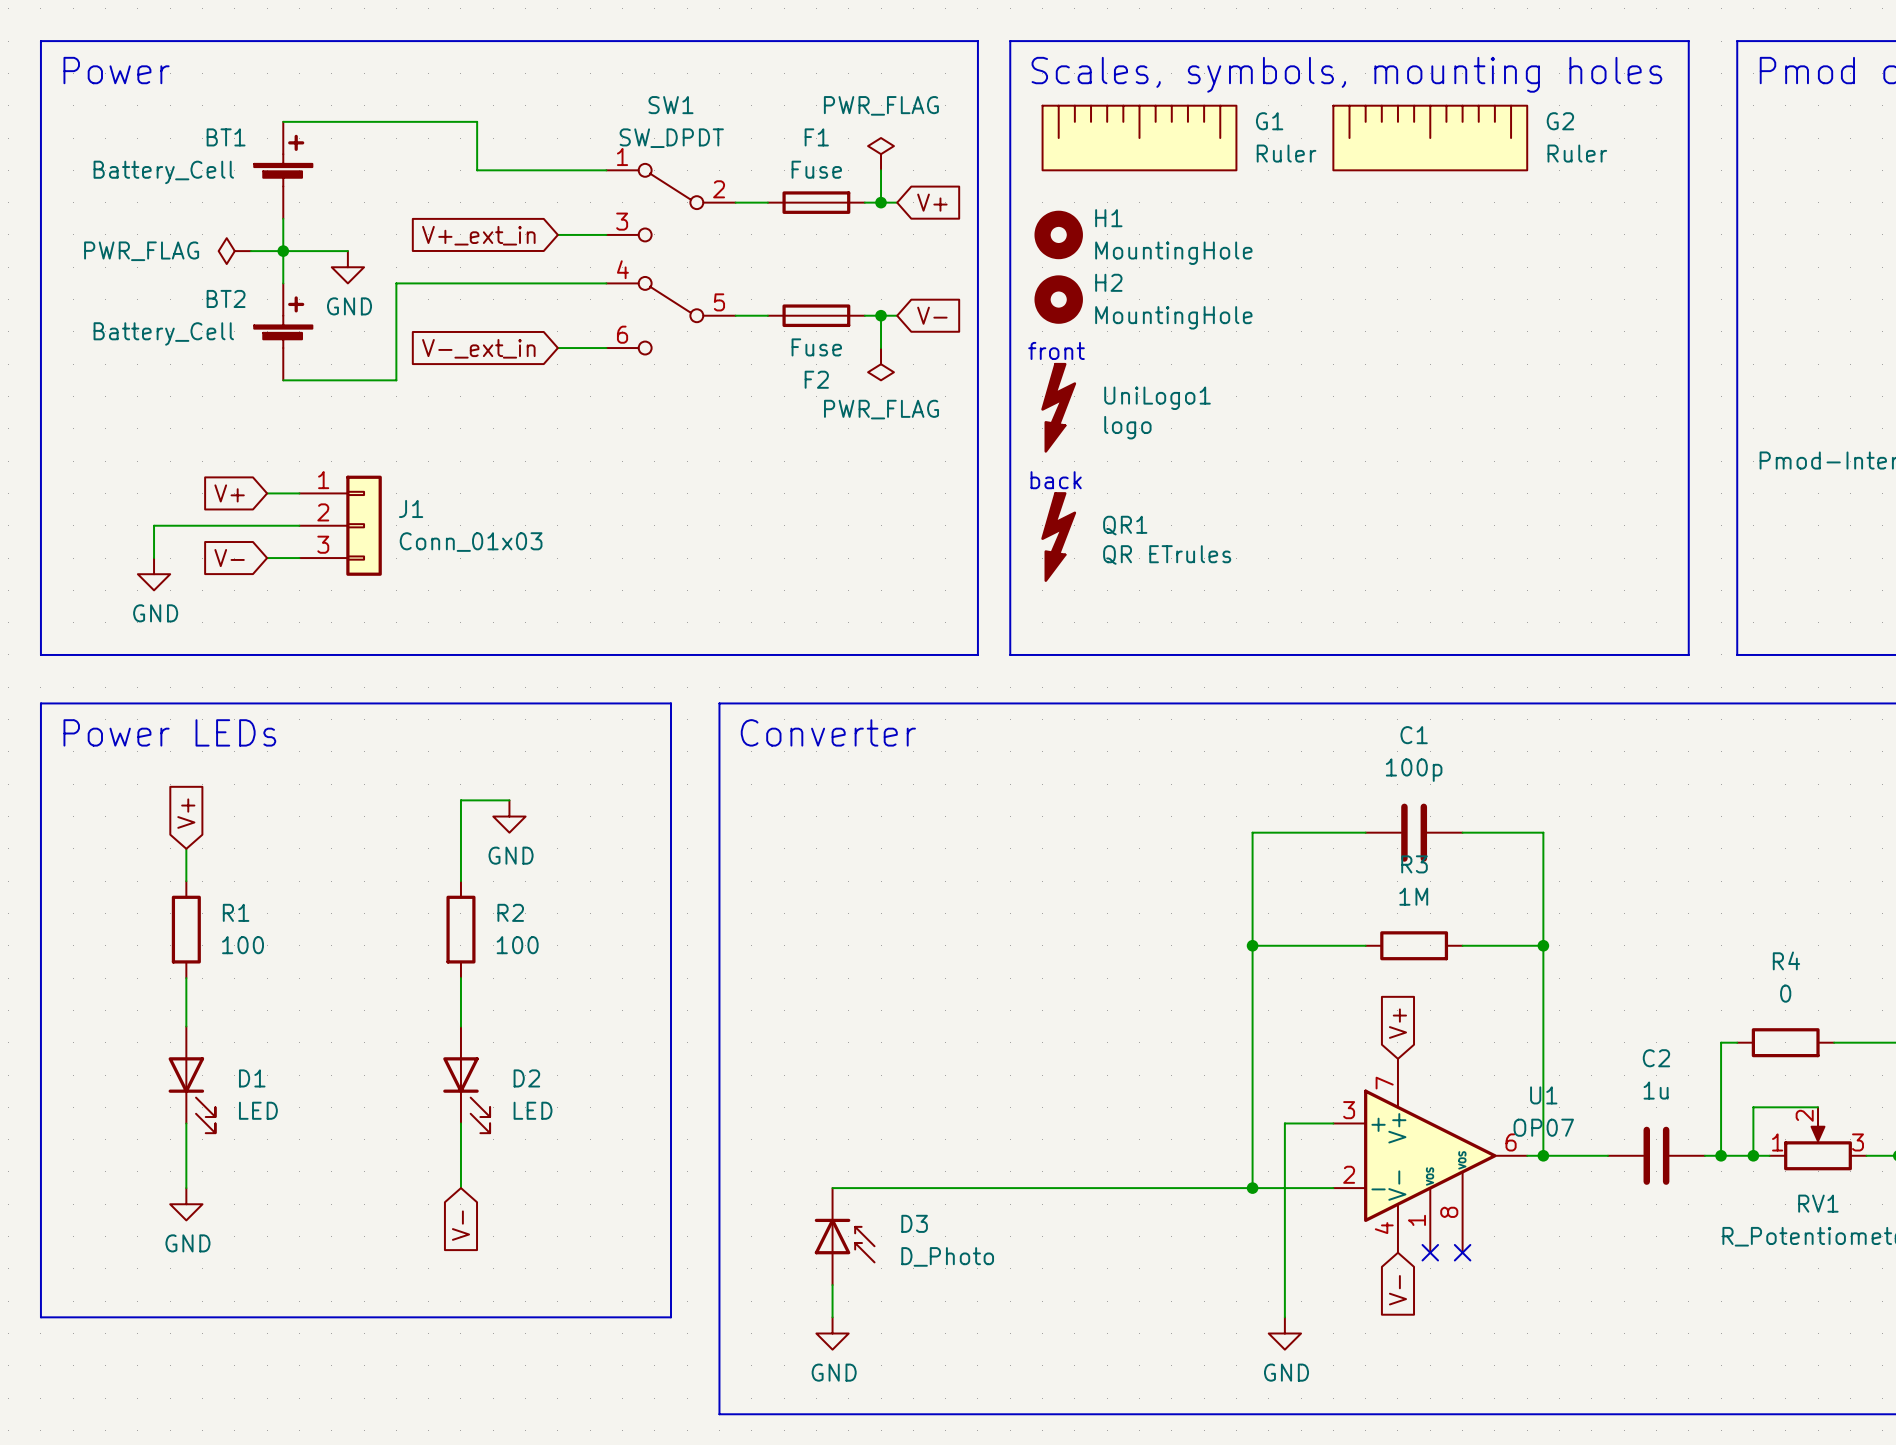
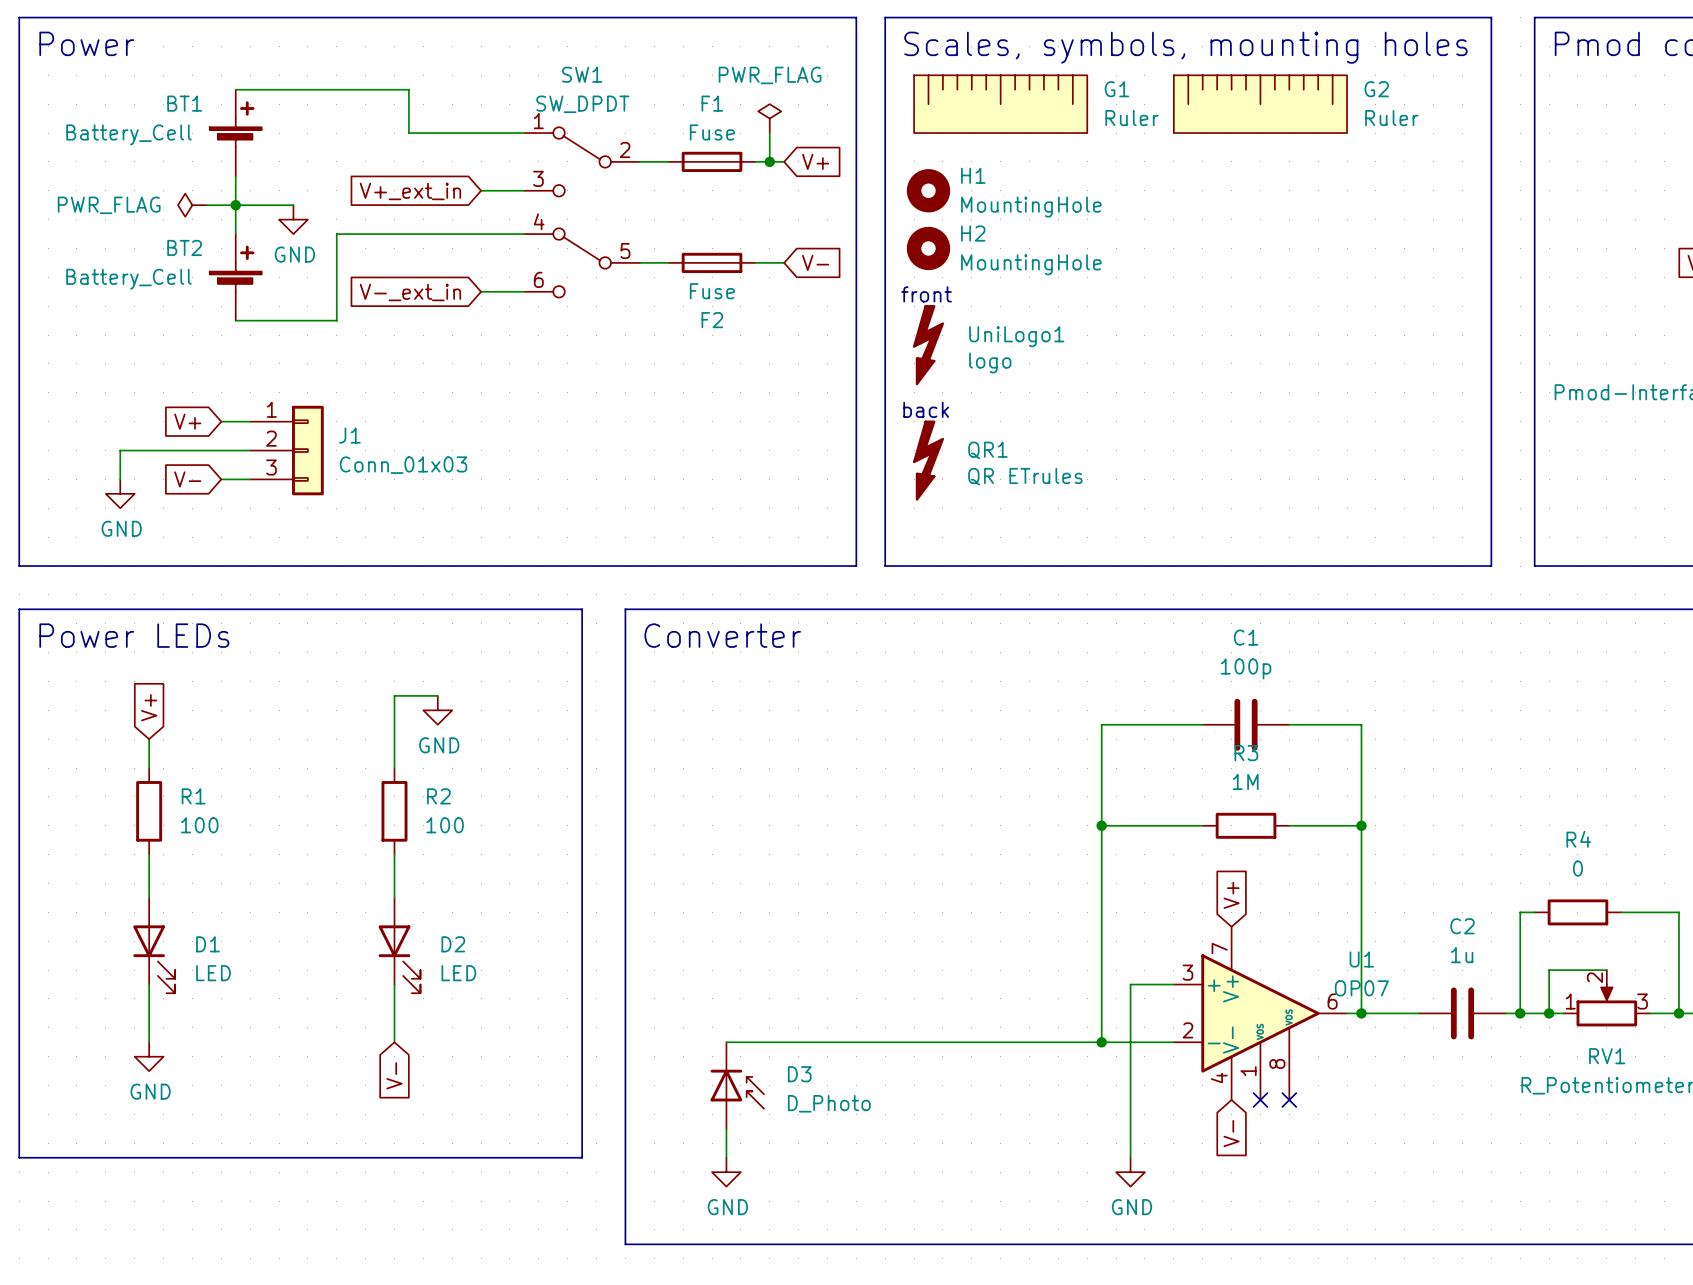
wire: (881, 315) (881, 348) -> none
junction: (881, 315) -> none
power symbol: PWR_FLAG (881, 364) -> none

